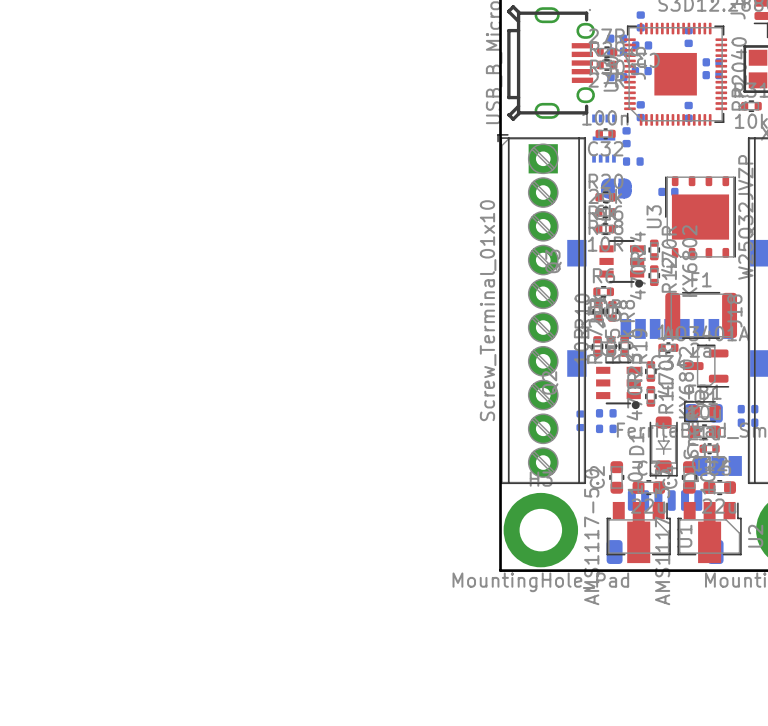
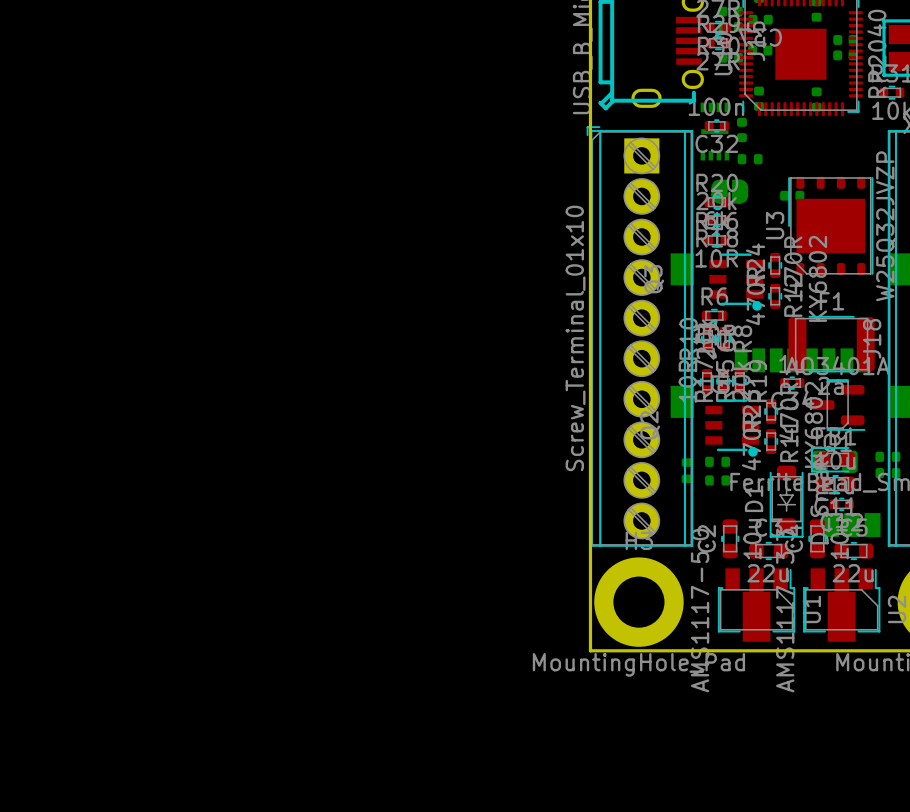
part: (665, 527) -> none

